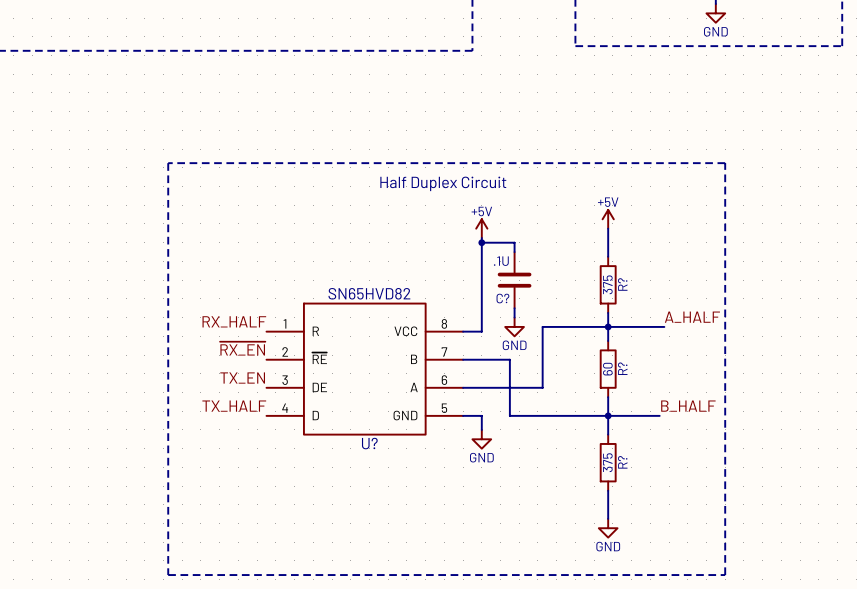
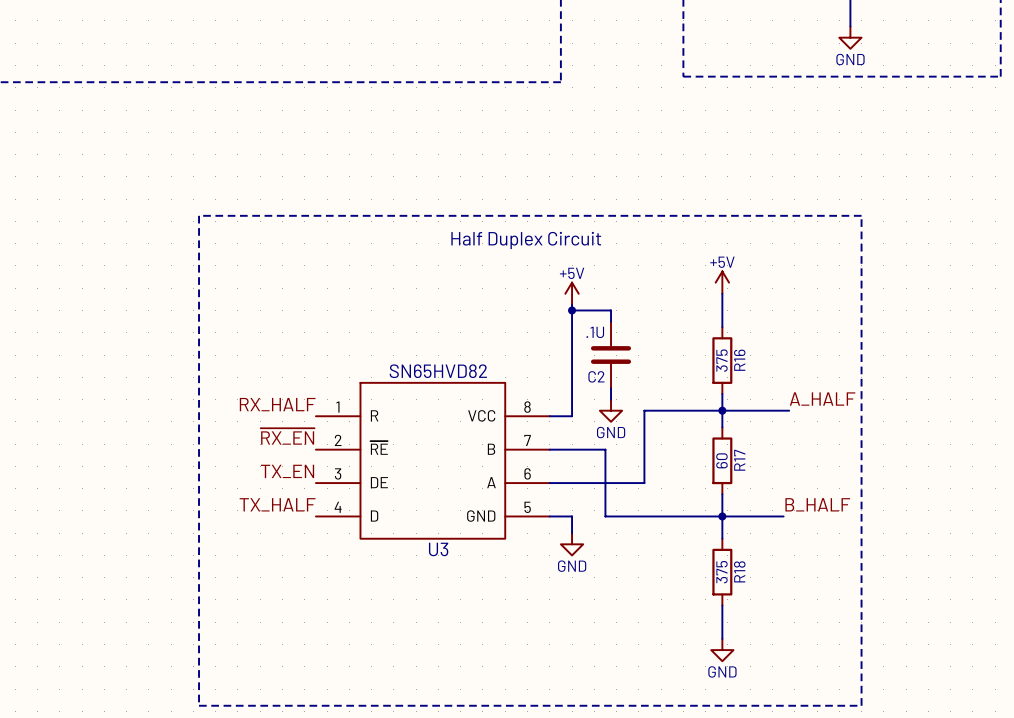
R? name: R? (622, 284) -> R16 (739, 360)
C? name: C? (502, 298) -> C2 (596, 376)
R? name: R? (622, 368) -> R17 (739, 460)
U? name: U? (369, 443) -> U3 (438, 549)
R? name: R? (622, 462) -> R18 (739, 571)

